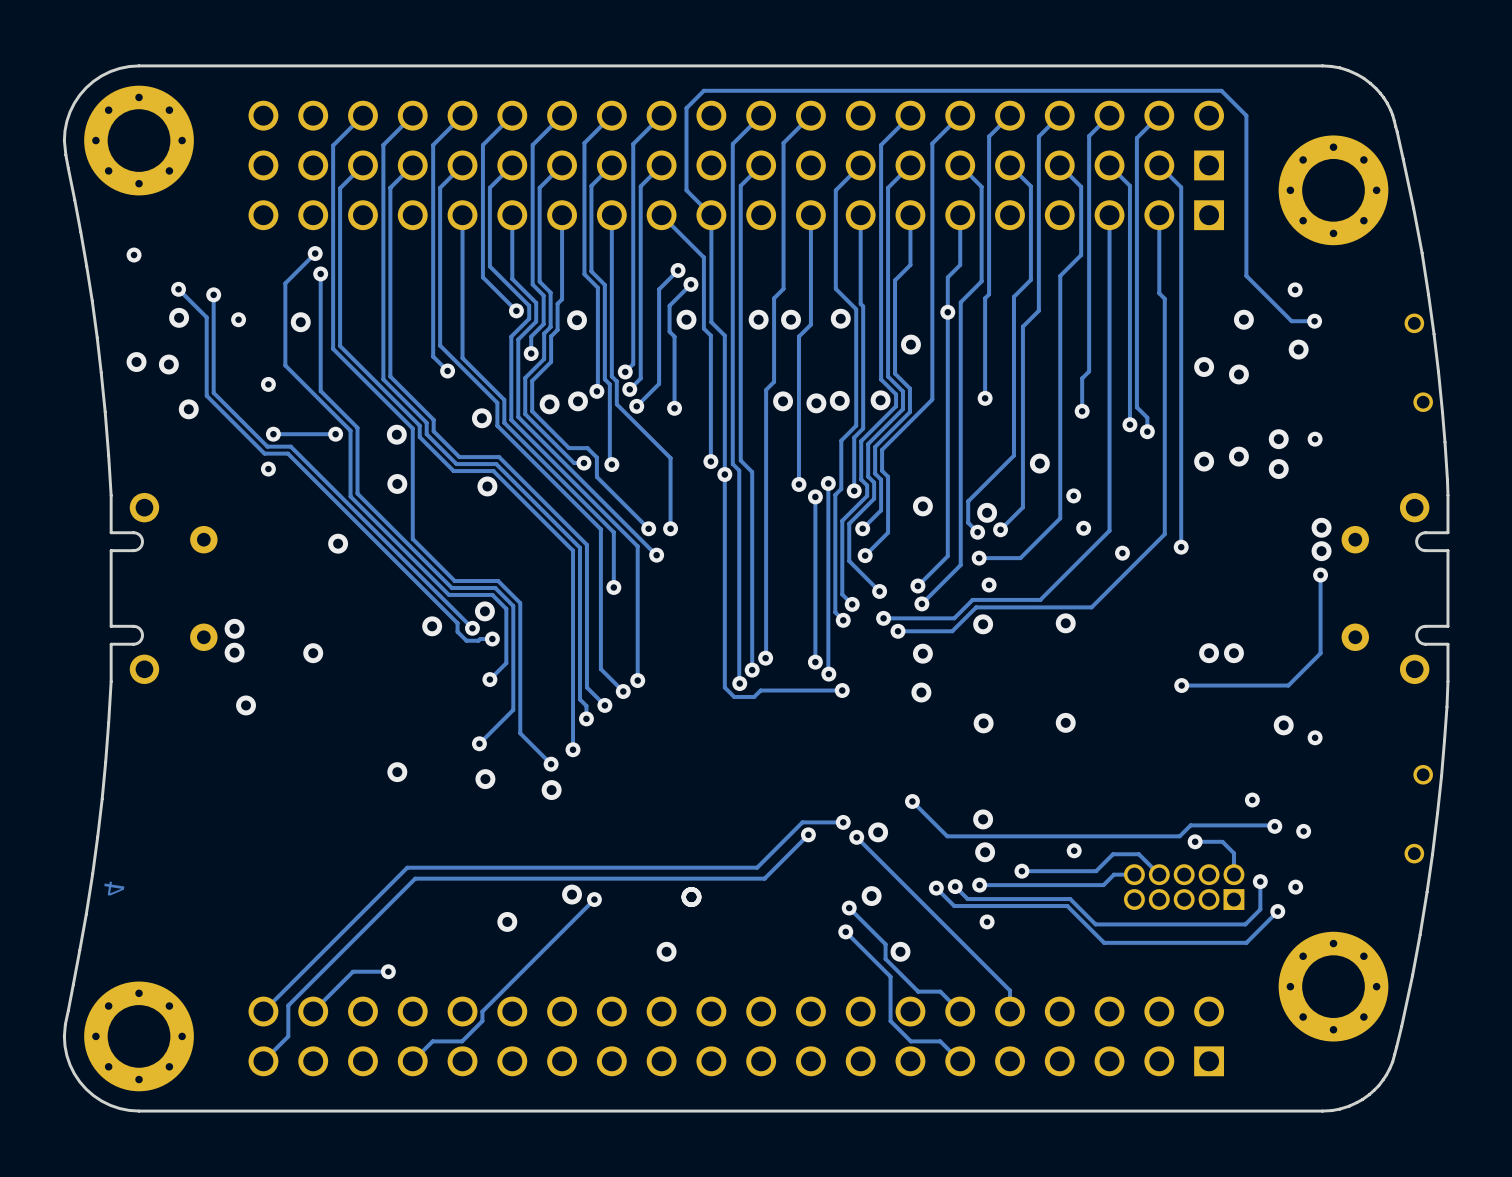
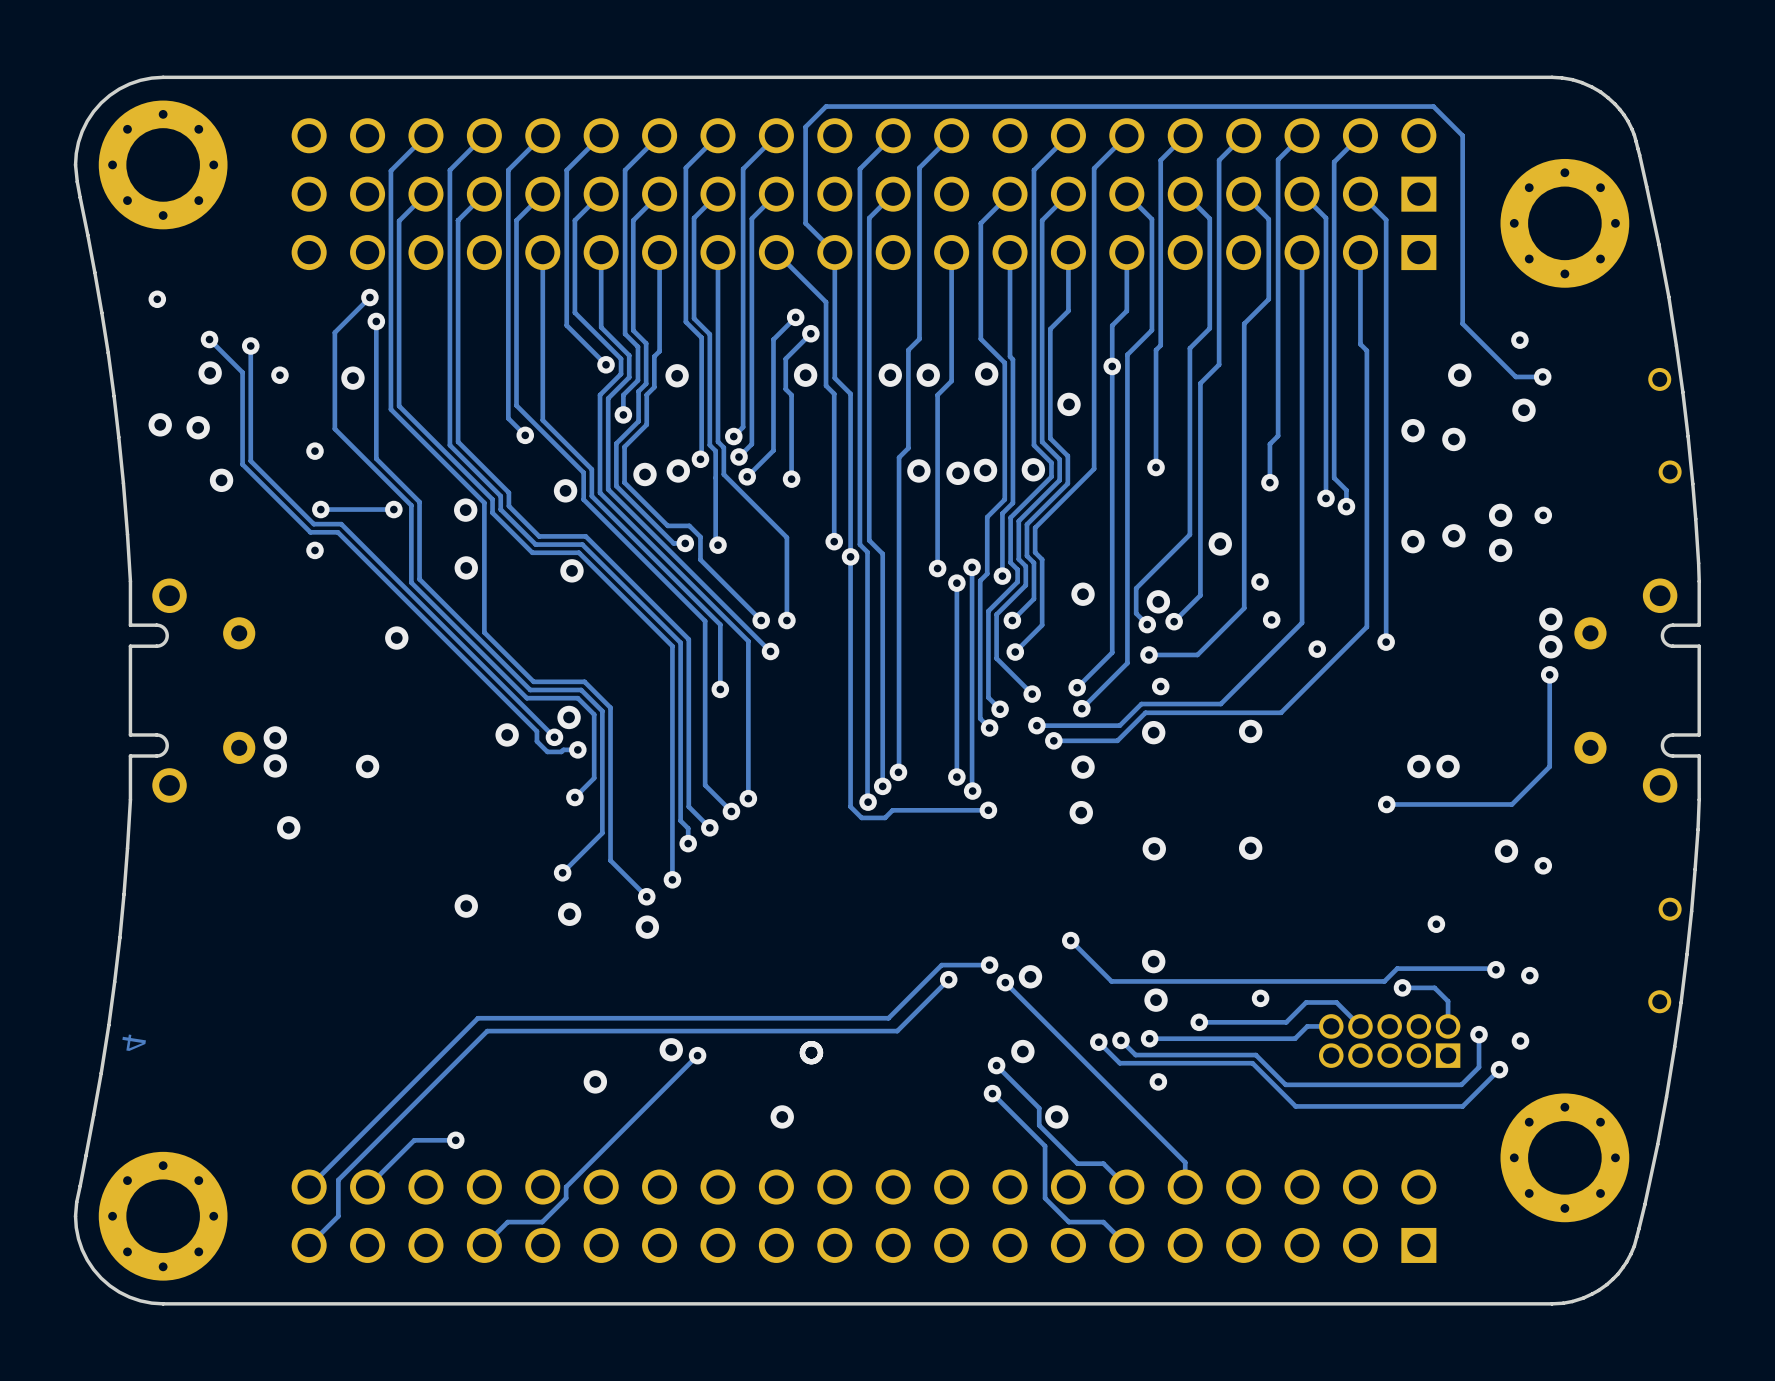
via position: (1252, 800) -> (1436, 924)

